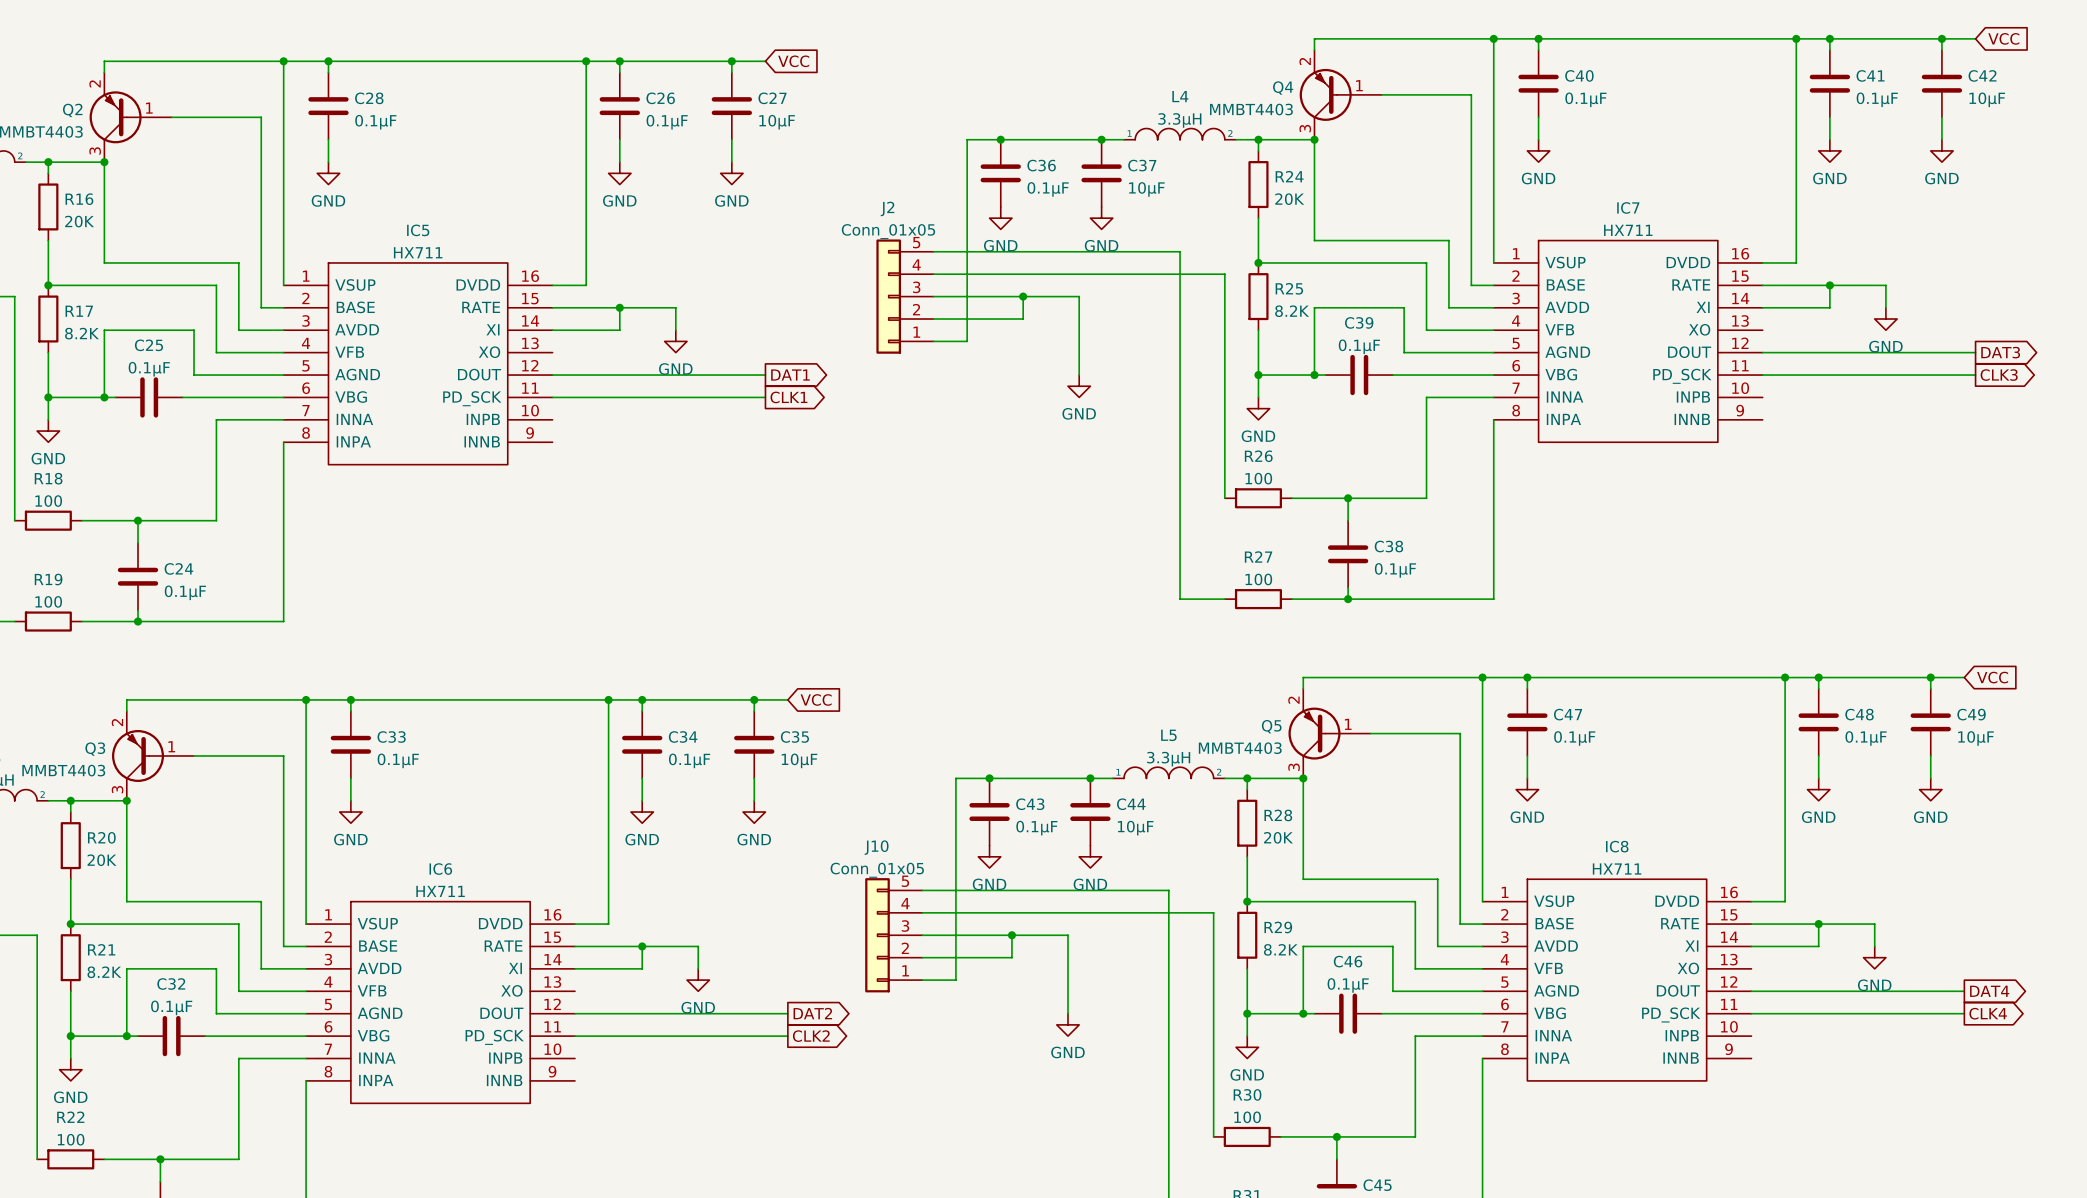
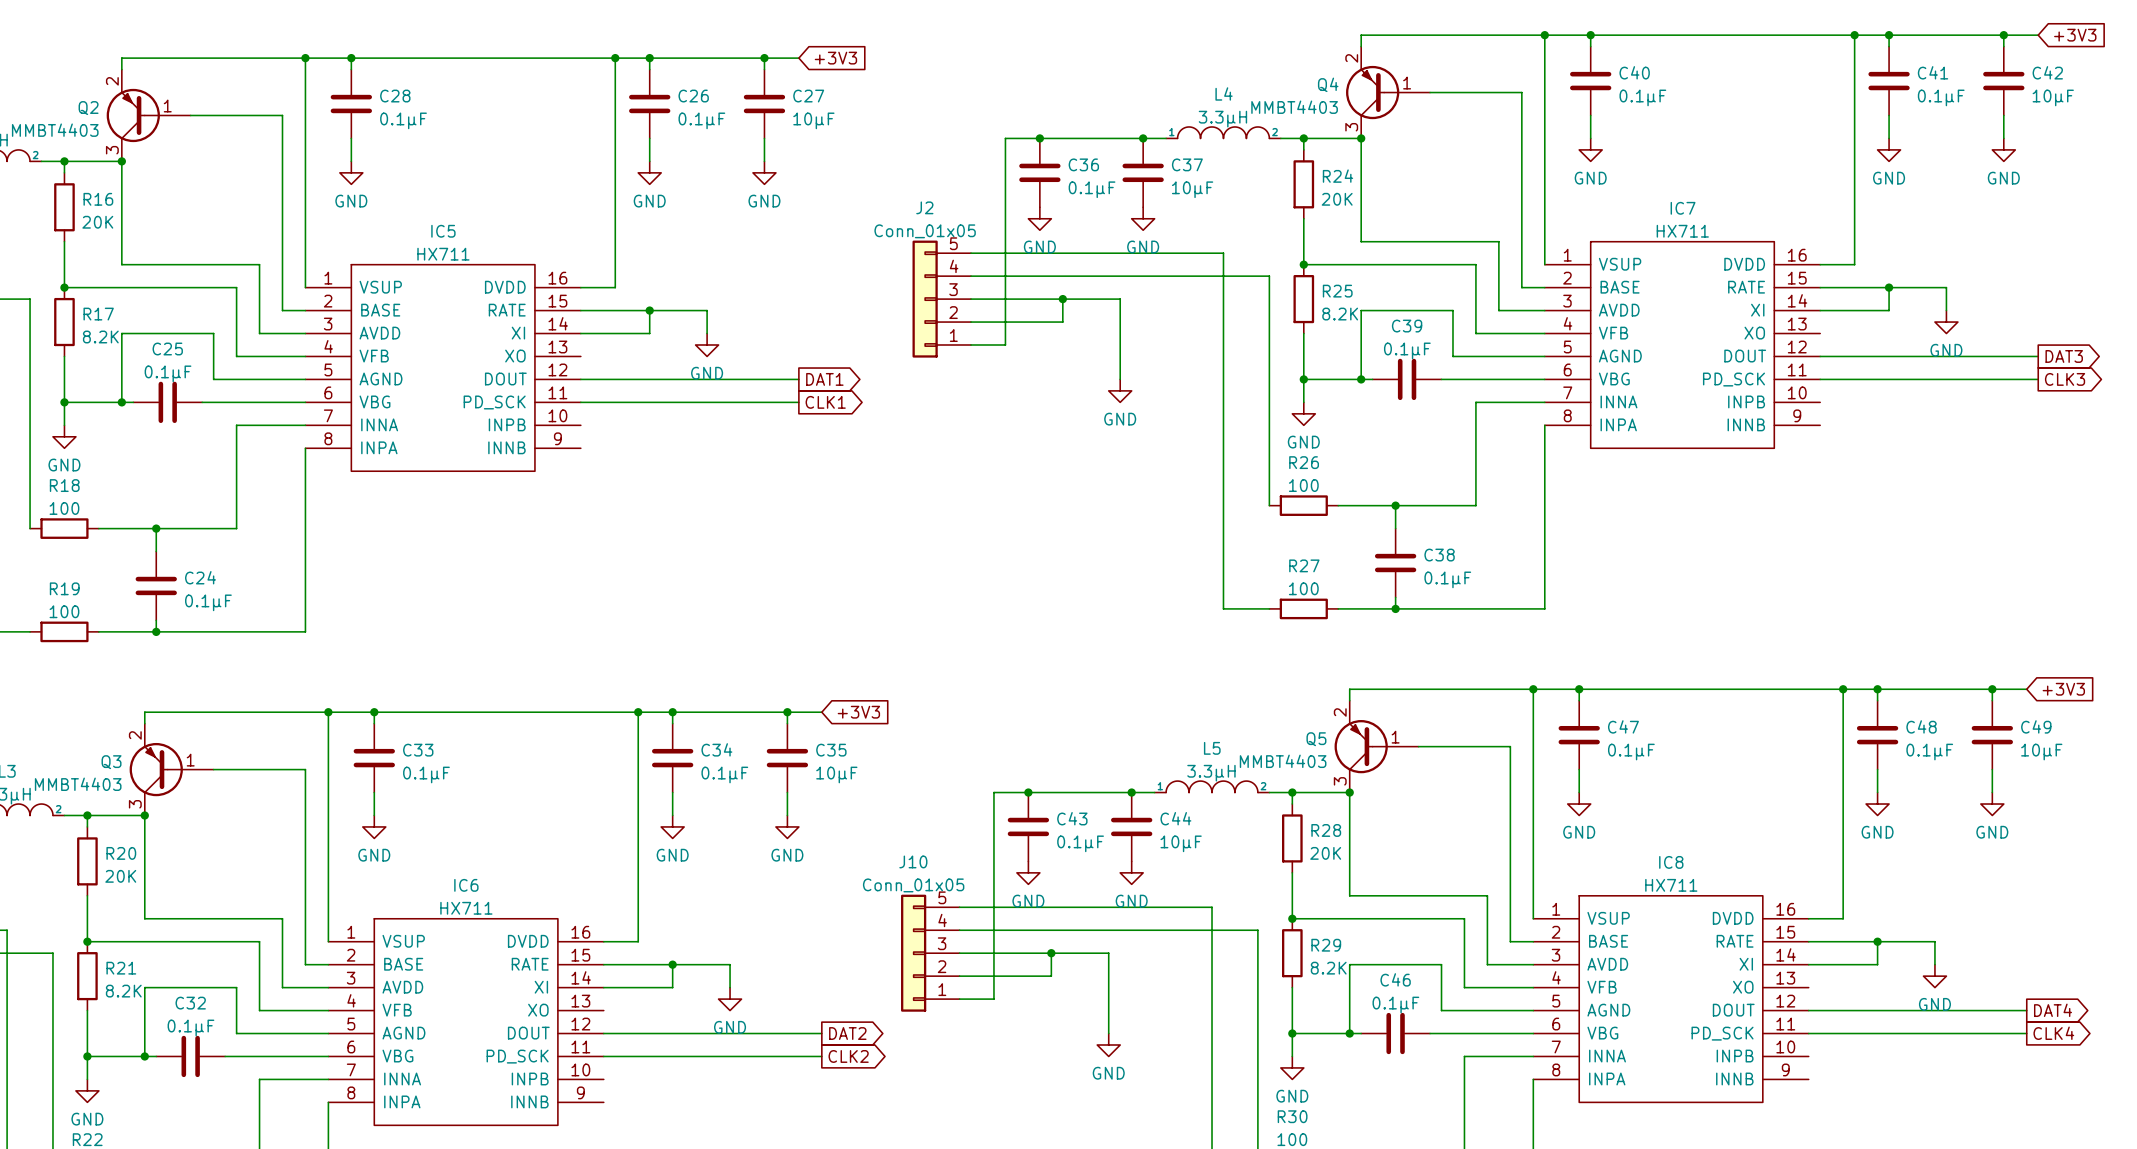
global label: VCC (2003, 38) -> +3V3 (2075, 35)
global label: VCC (793, 61) -> +3V3 (835, 58)
global label: VCC (1992, 677) -> +3V3 (2063, 689)
global label: VCC (816, 699) -> +3V3 (858, 712)

